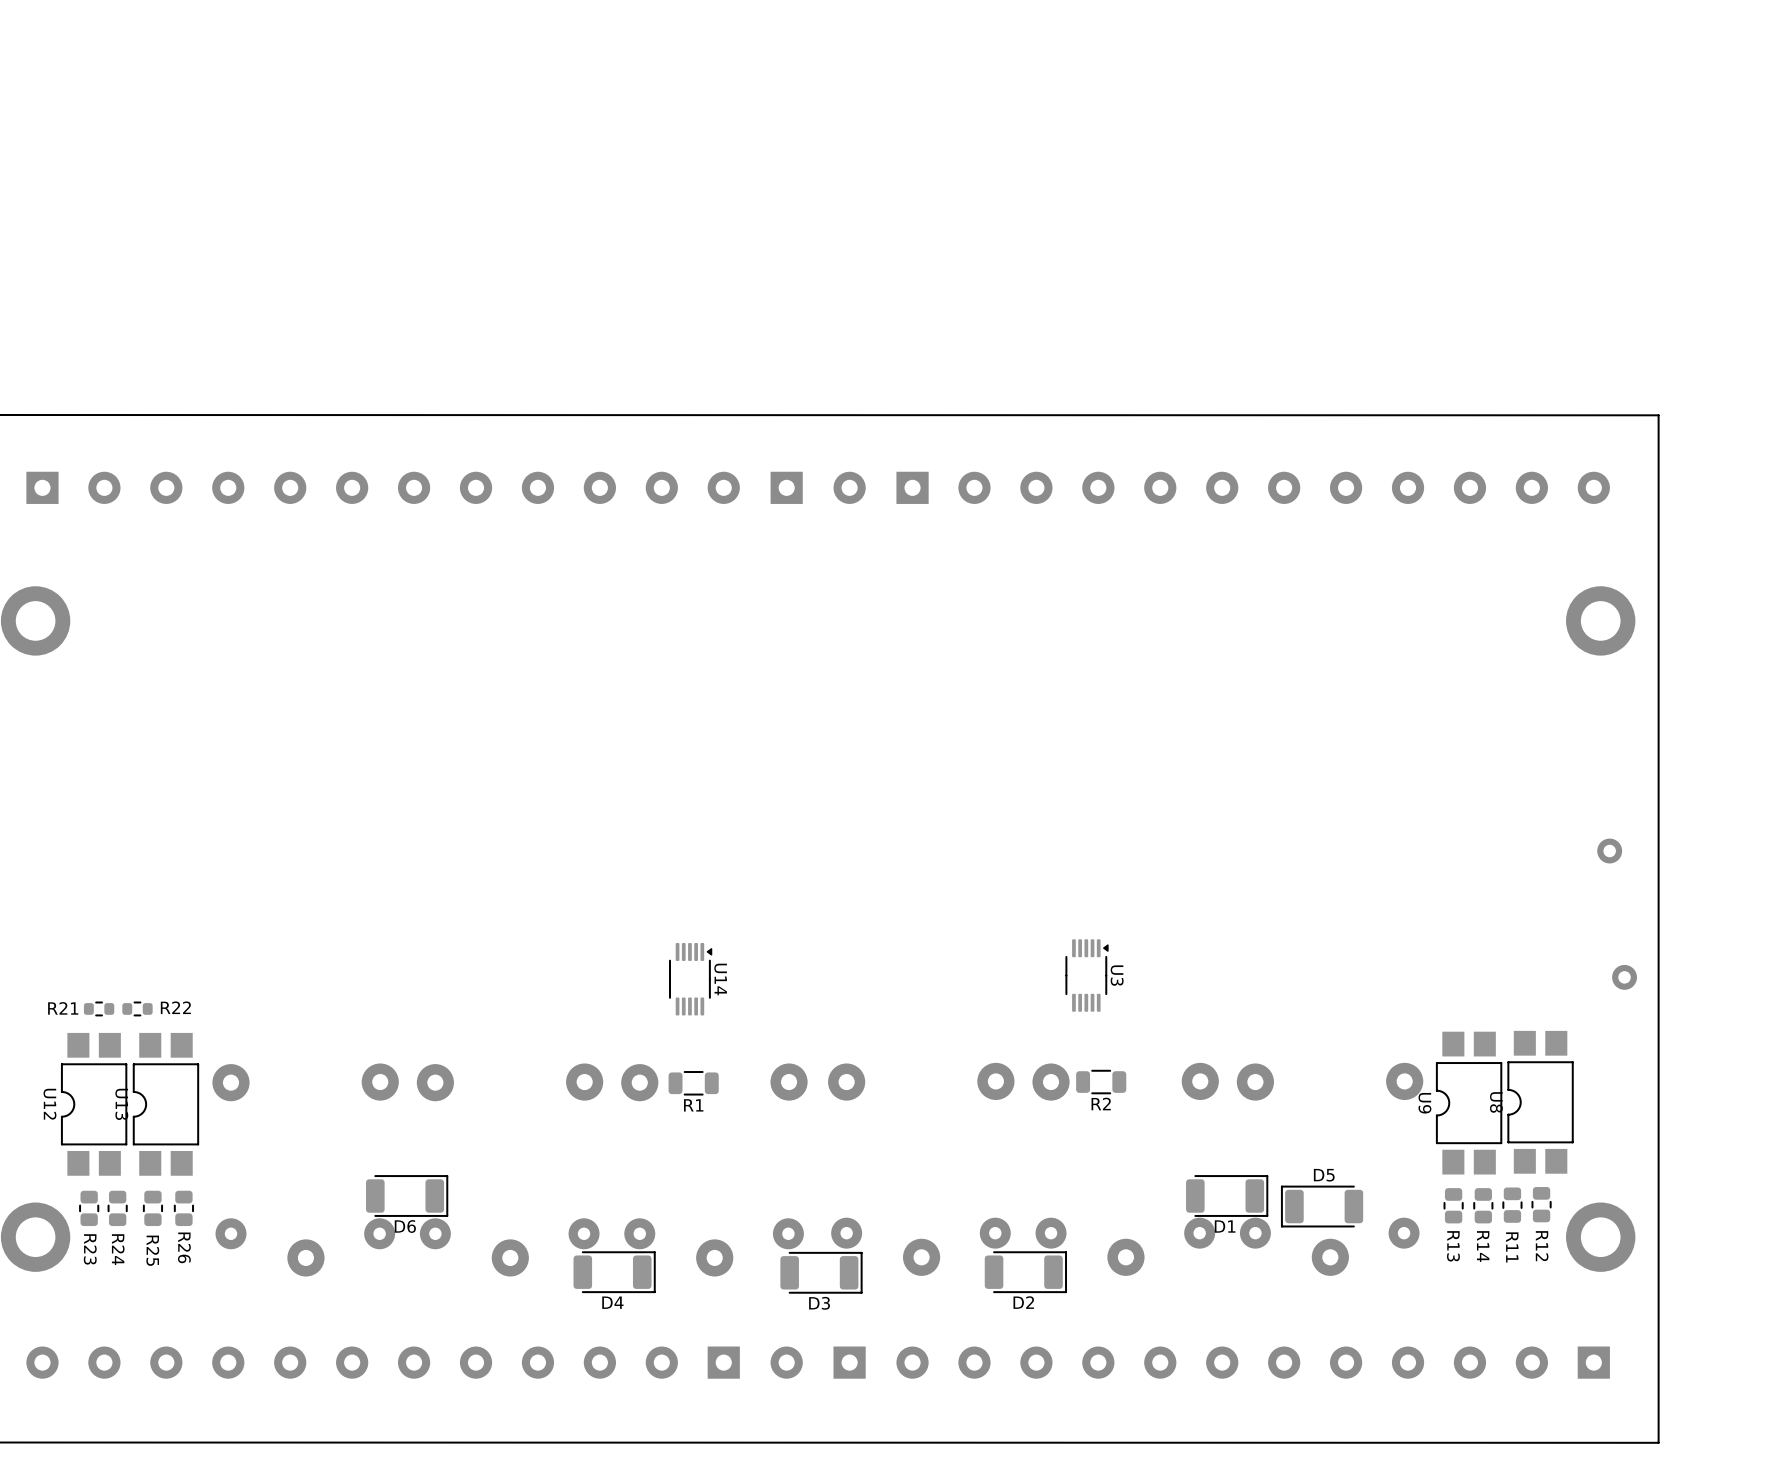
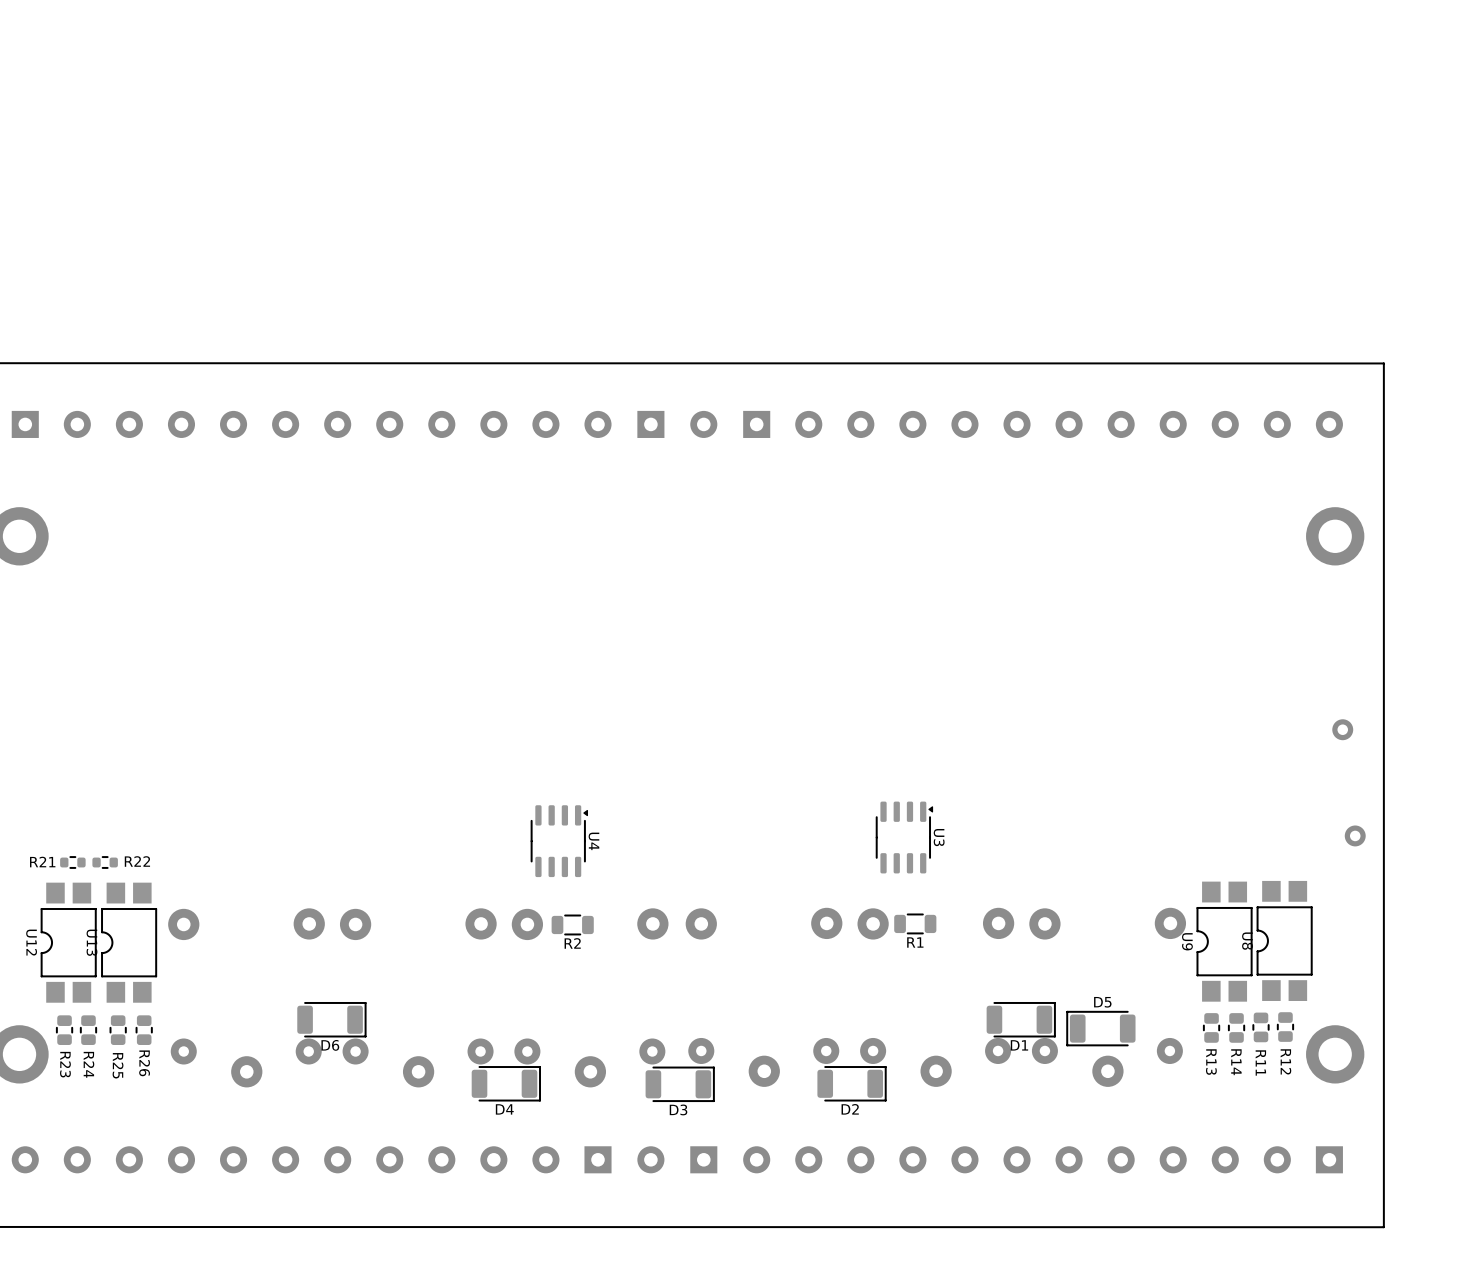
U3 footprint: [1065, 939, 1109, 1012] -> [876, 801, 934, 874]
U14: (690, 979) -> none
U4: none -> (559, 841)
R2 name: R2 (1101, 1104) -> R1 (915, 942)
R1 name: R1 (693, 1105) -> R2 (572, 943)

